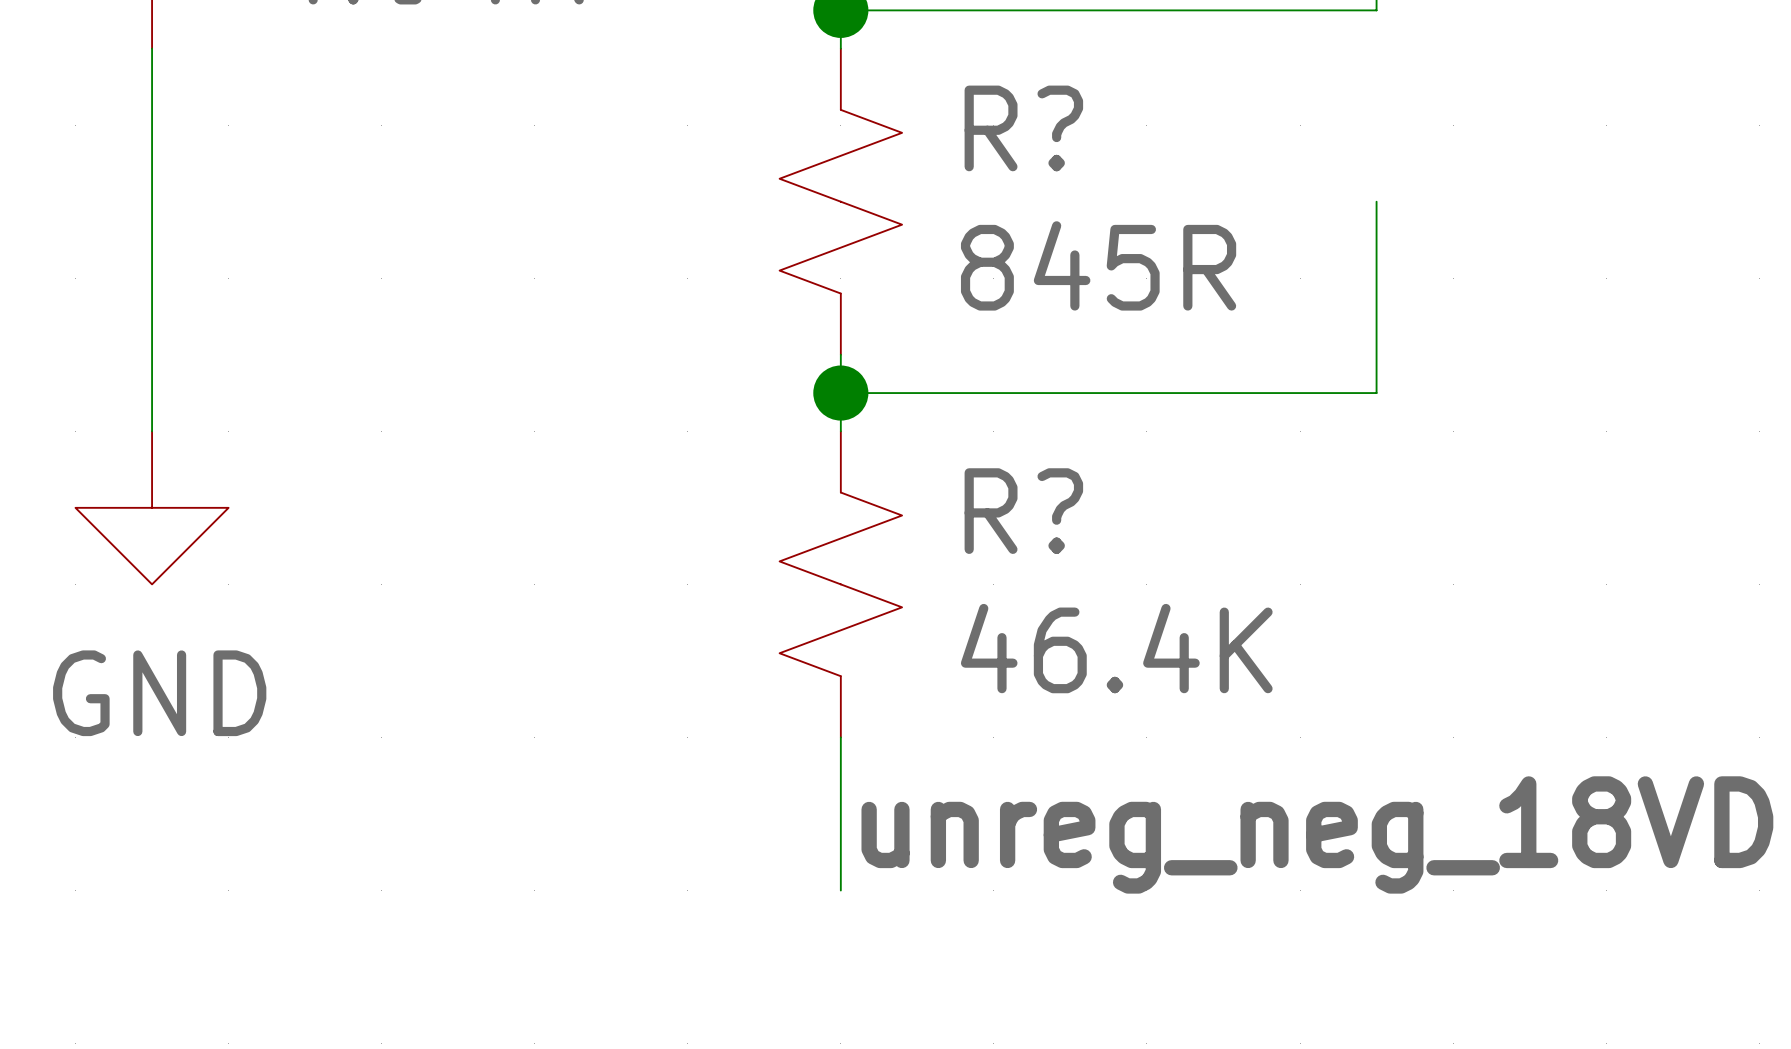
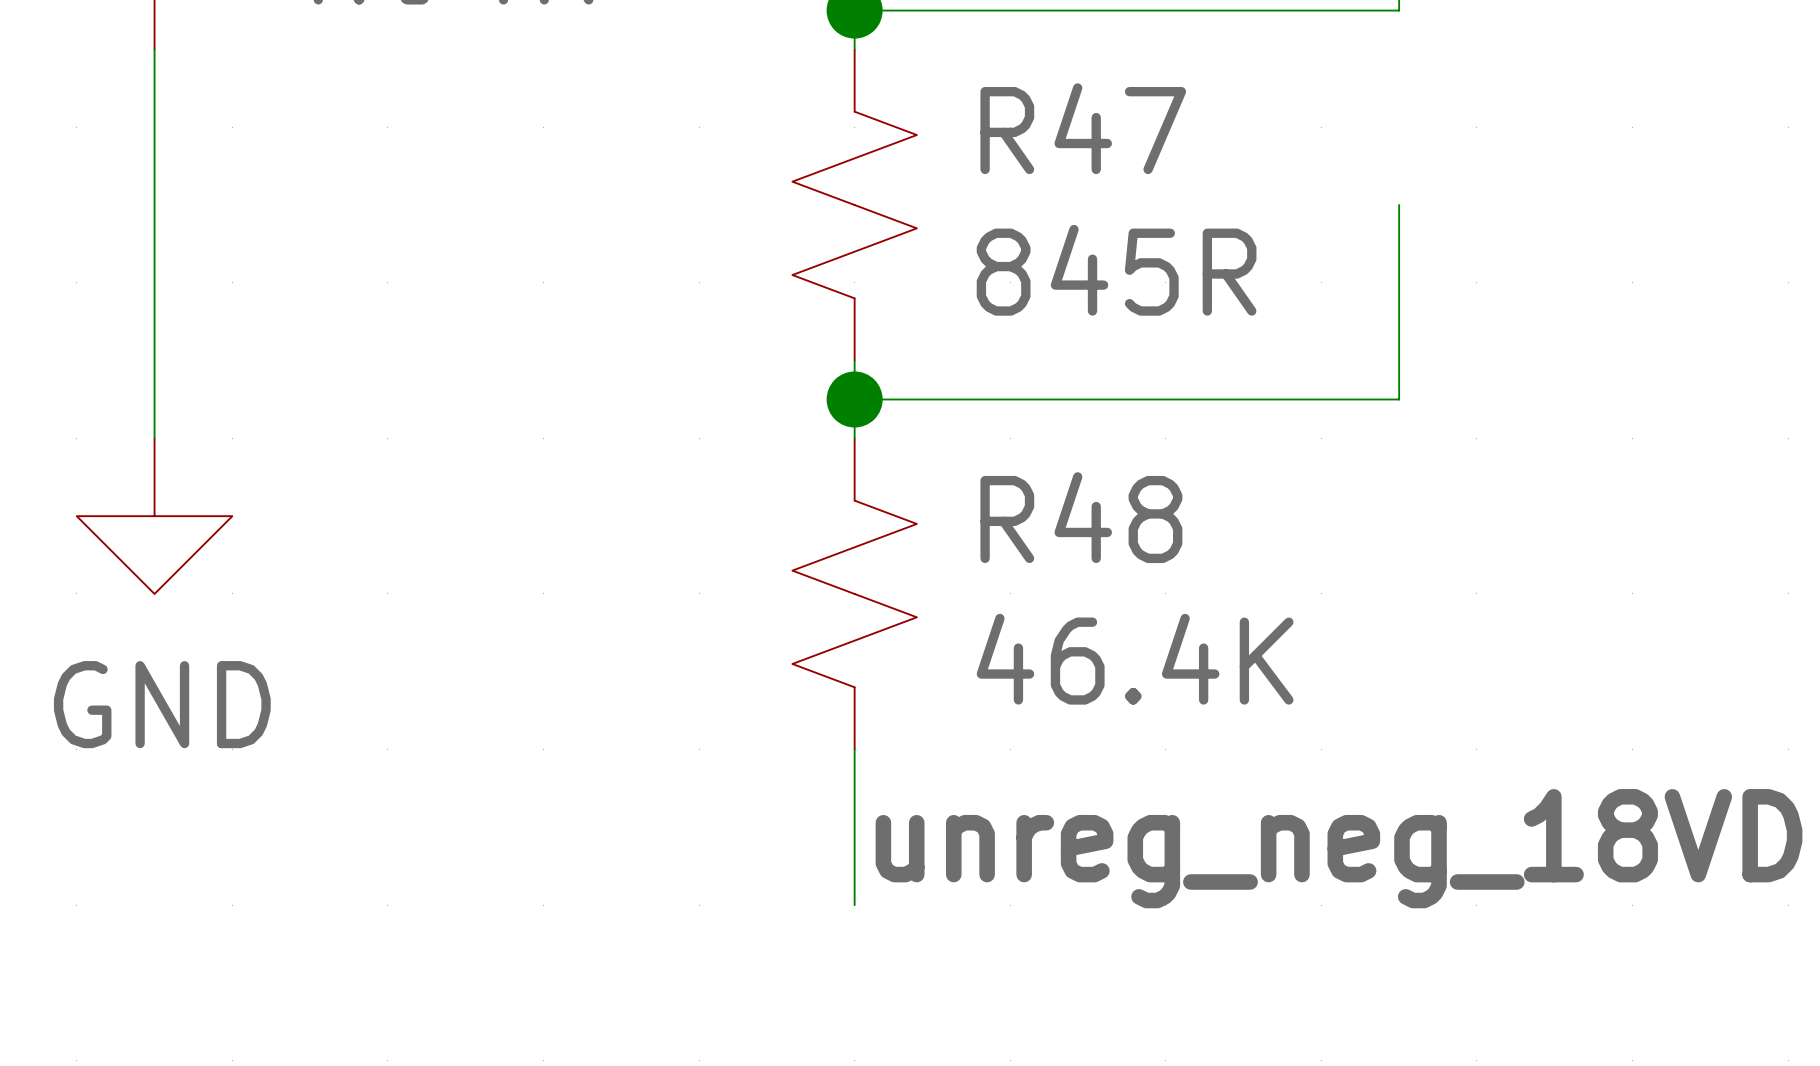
R? name: R? (1023, 128) -> R47 (1083, 128)
R? name: R? (1023, 511) -> R48 (1081, 517)

